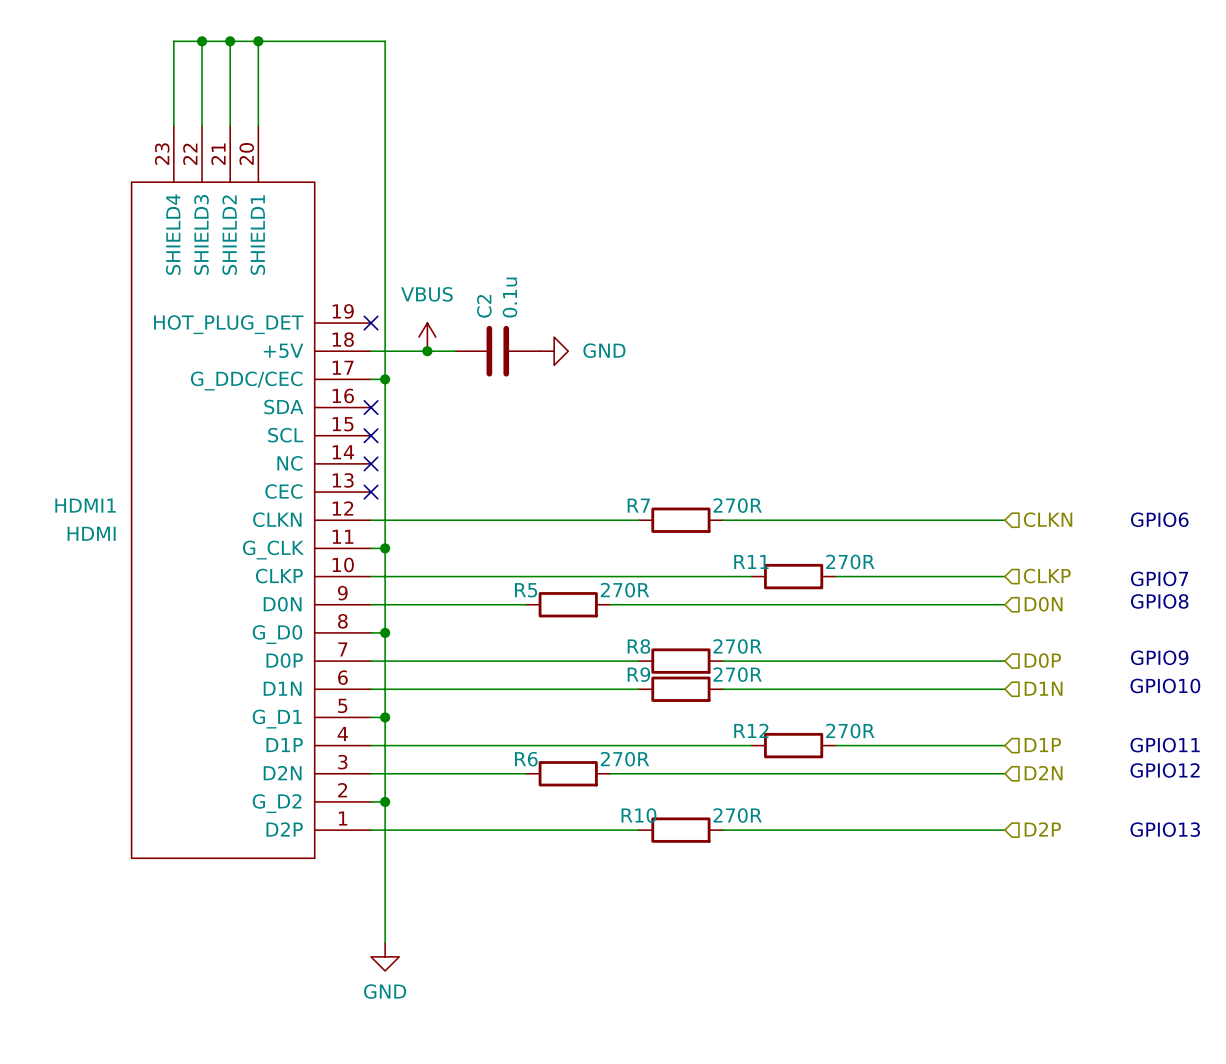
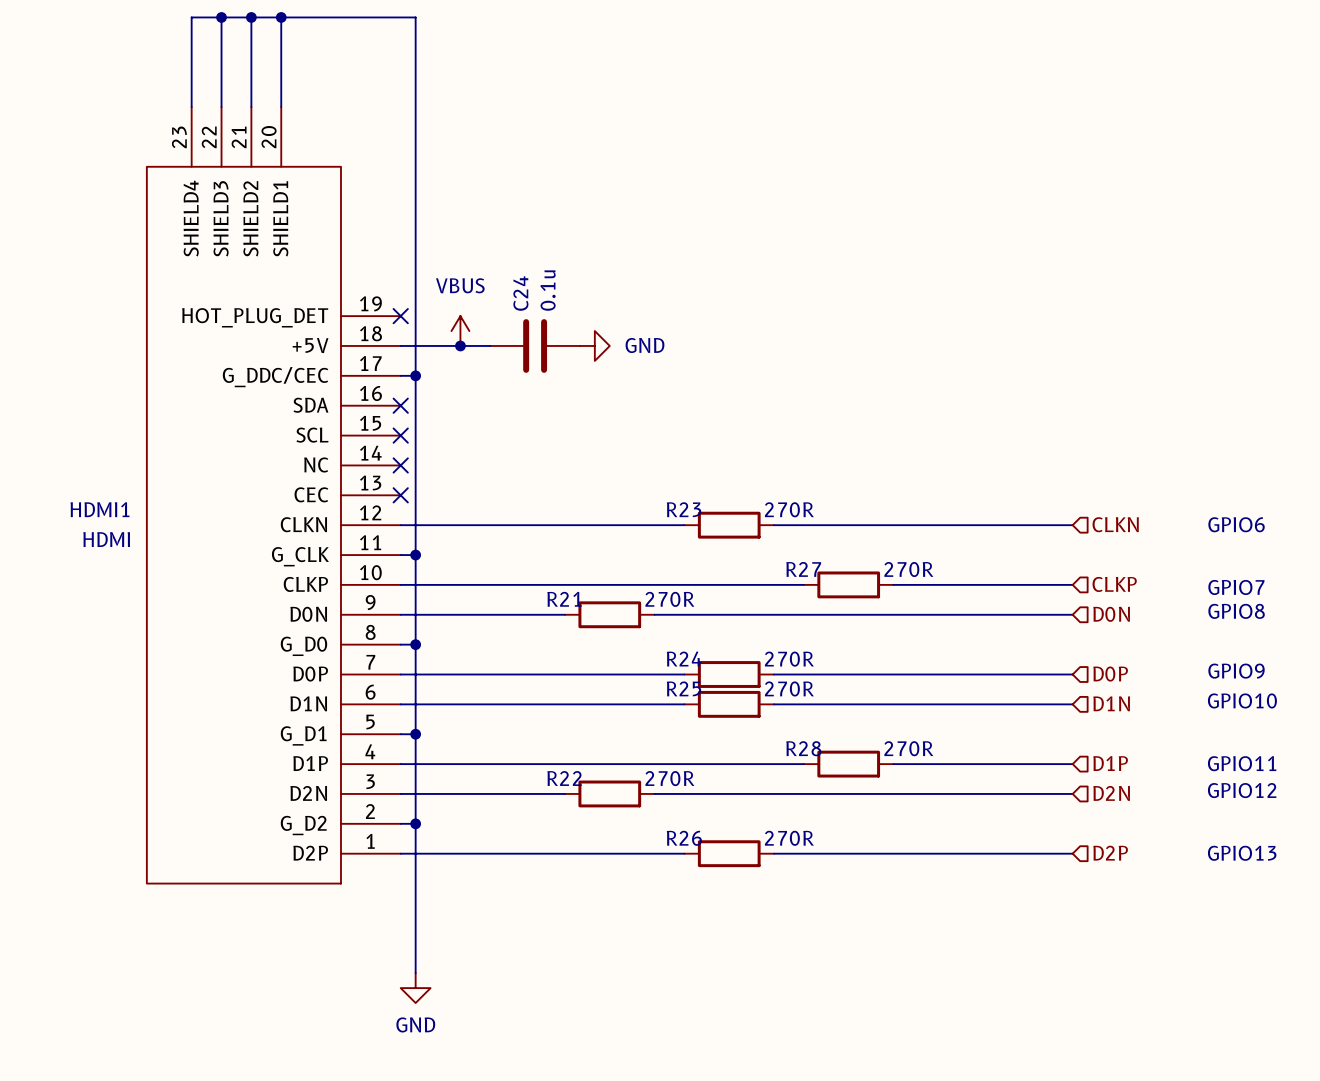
C2 name: C2 (484, 306) -> C24 (520, 293)
R7 name: R7 (638, 505) -> R23 (684, 509)
R11 name: R11 (751, 561) -> R27 (803, 569)
R5 name: R5 (526, 590) -> R21 (564, 599)
R8 name: R8 (638, 646) -> R24 (684, 659)
R9 name: R9 (638, 674) -> R25 (683, 688)
R12 name: R12 (751, 730) -> R28 (803, 748)
R6 name: R6 (526, 759) -> R22 (564, 778)
R10 name: R10 (638, 815) -> R26 (684, 838)

